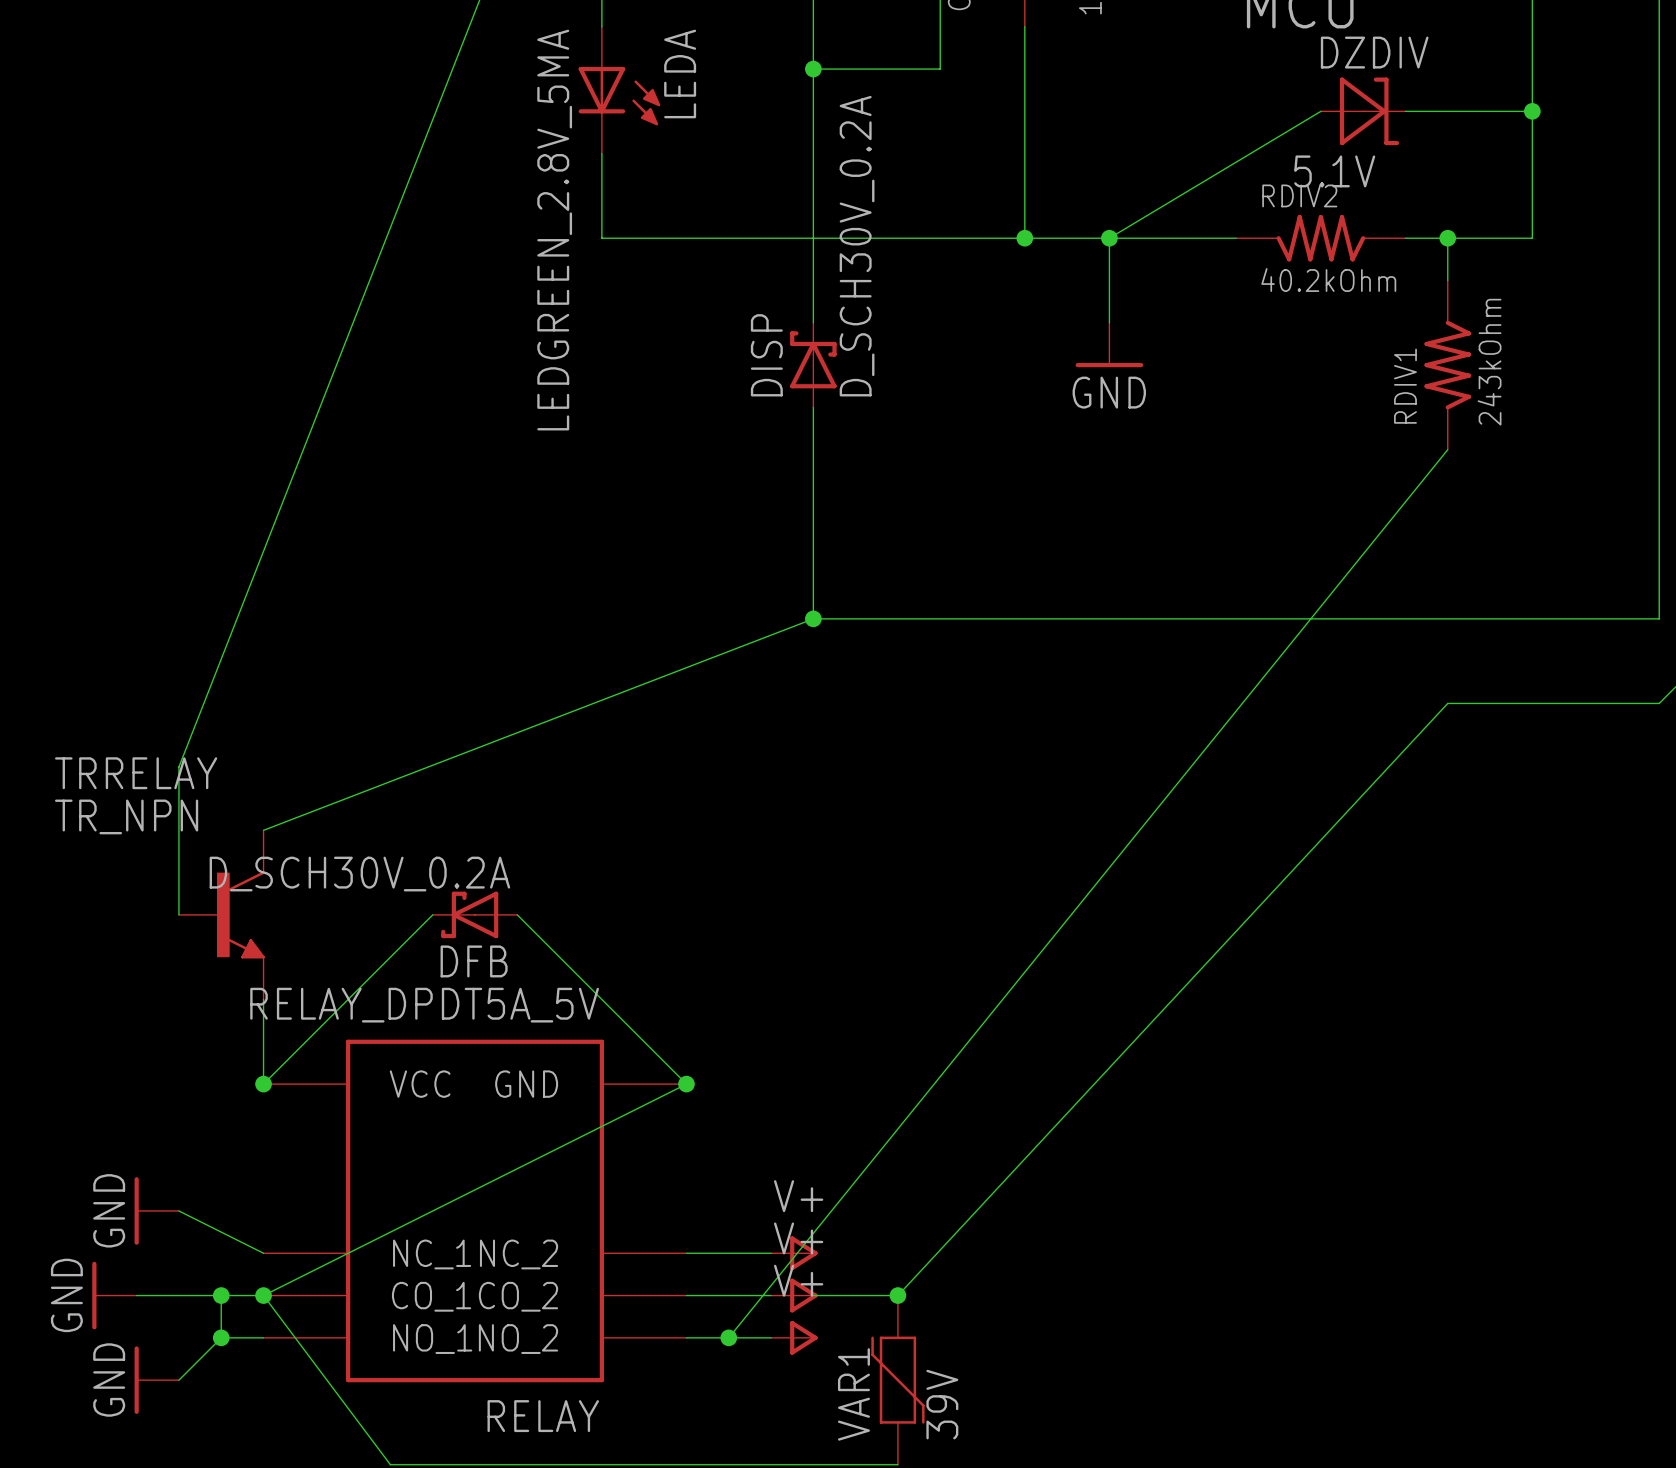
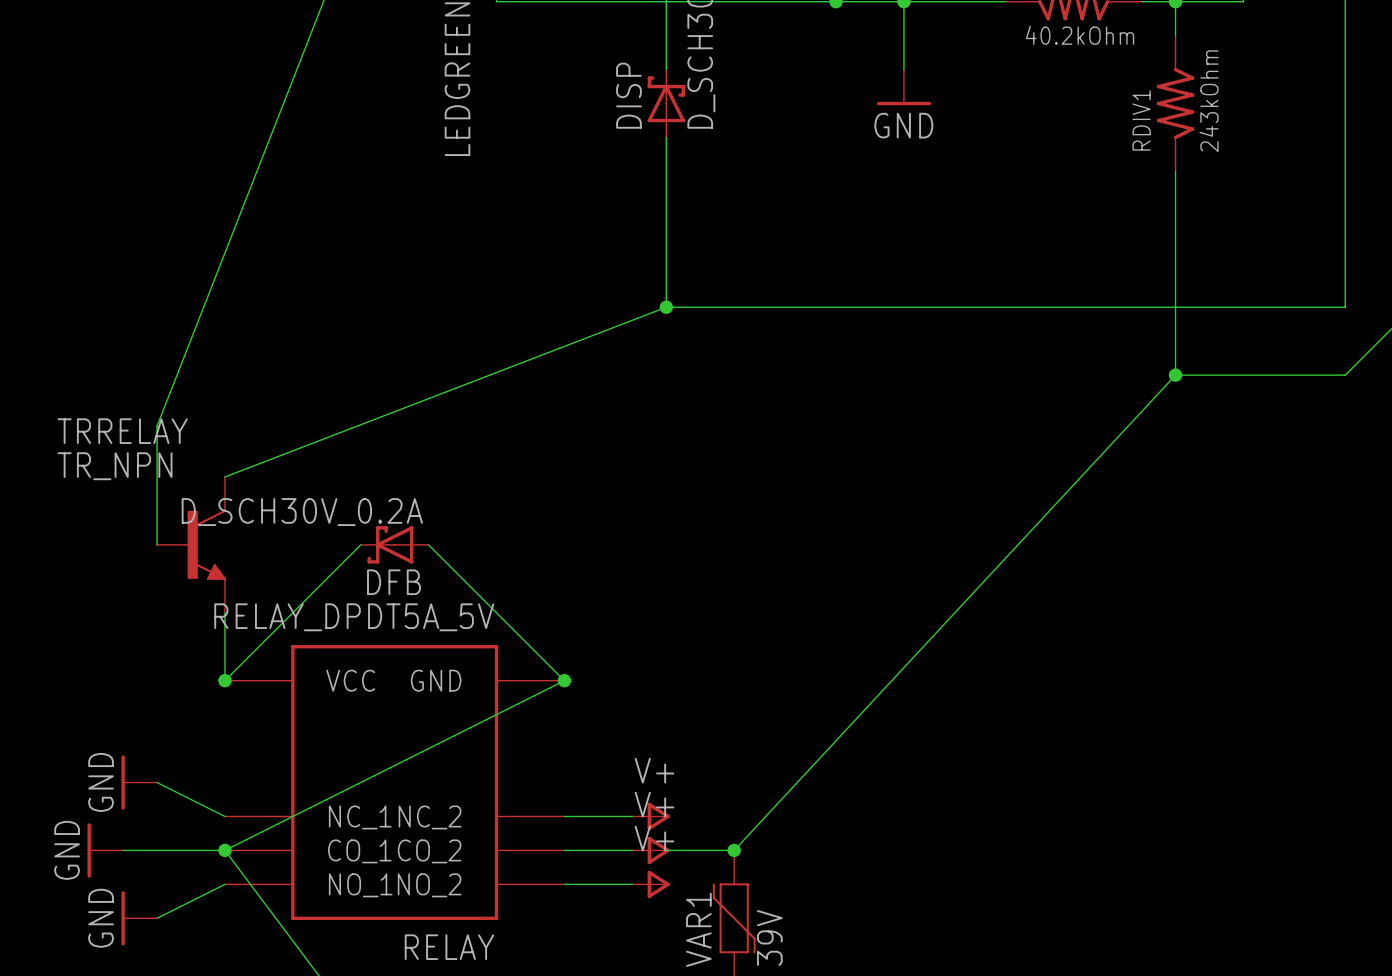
wire: (1447, 449) (728, 1337) -> (1175, 171) (1175, 375)
junction: none -> (1175, 375)
wire: (221, 1295) (221, 1337) -> none
junction: (221, 1295) -> none
wire: (221, 1337) (178, 1380) -> (224, 884) (157, 918)
wire: (221, 1337) (263, 1337) -> none
junction: (221, 1337) -> none
junction: (728, 1337) -> none

